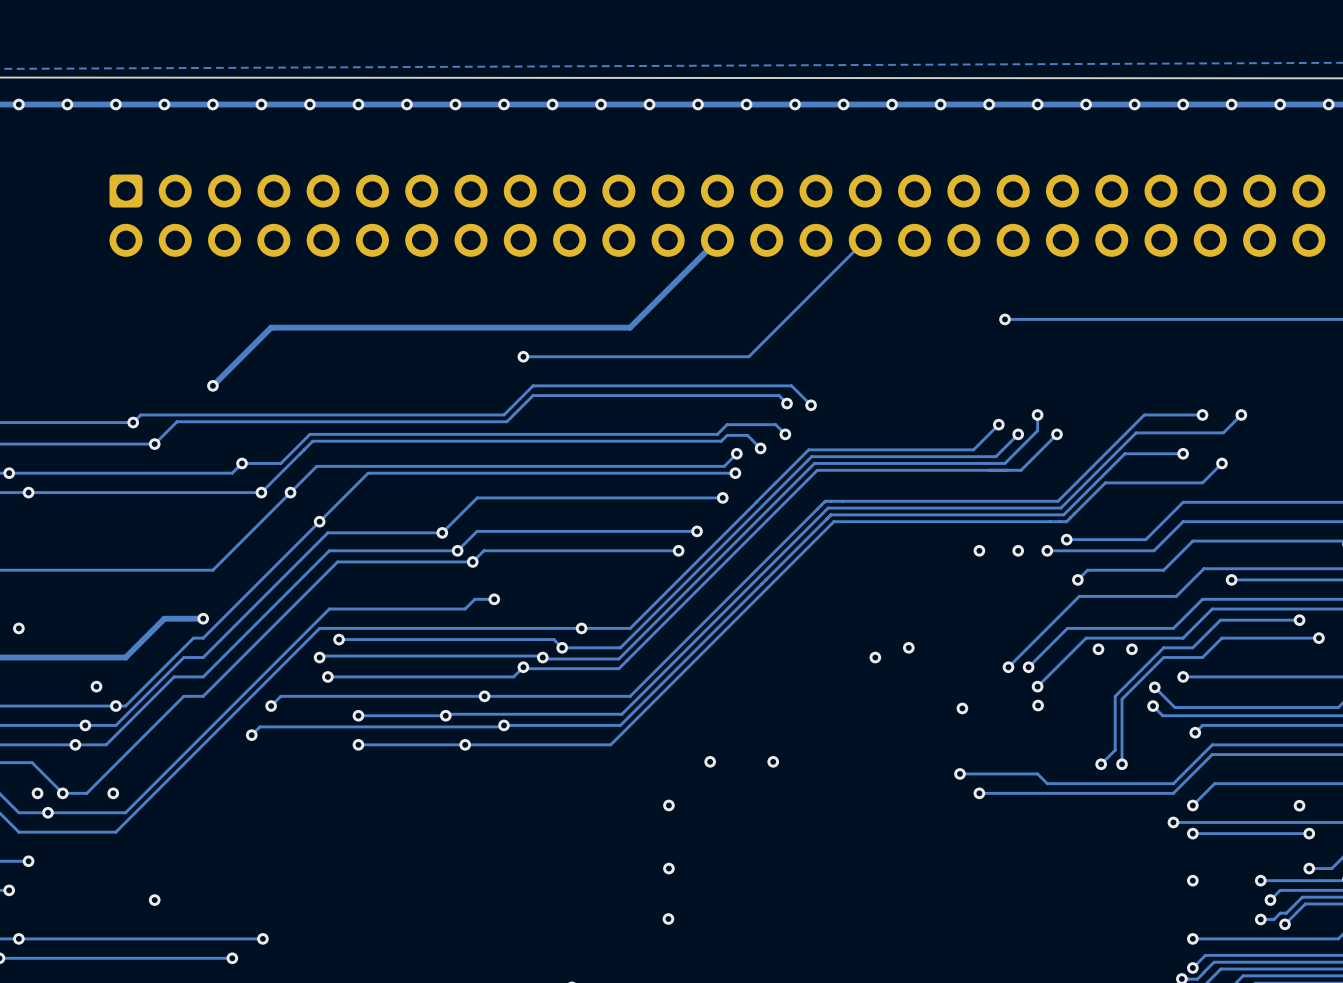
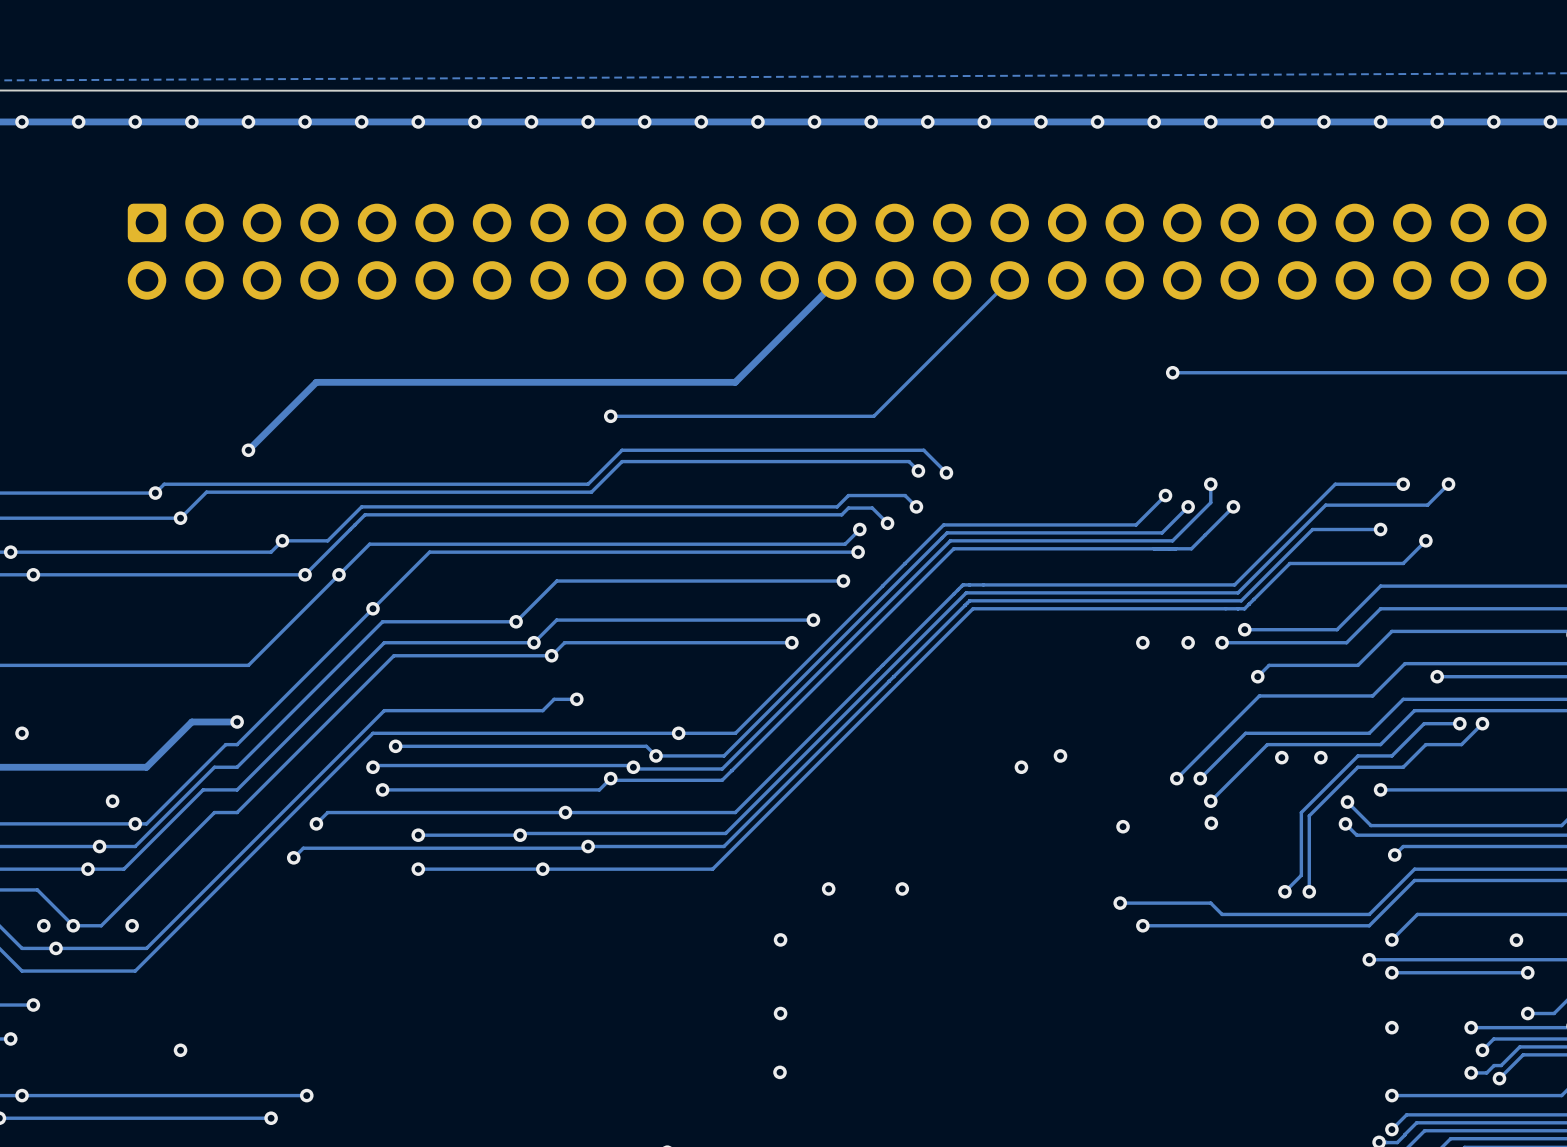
via: none -> (1459, 723)
via: none -> (1482, 723)
track: (1299, 620) (1251, 620) -> none
via: (1299, 620) -> none
track: (1318, 638) (1252, 638) -> (1482, 723) (1461, 744)
via: (1318, 638) -> none

